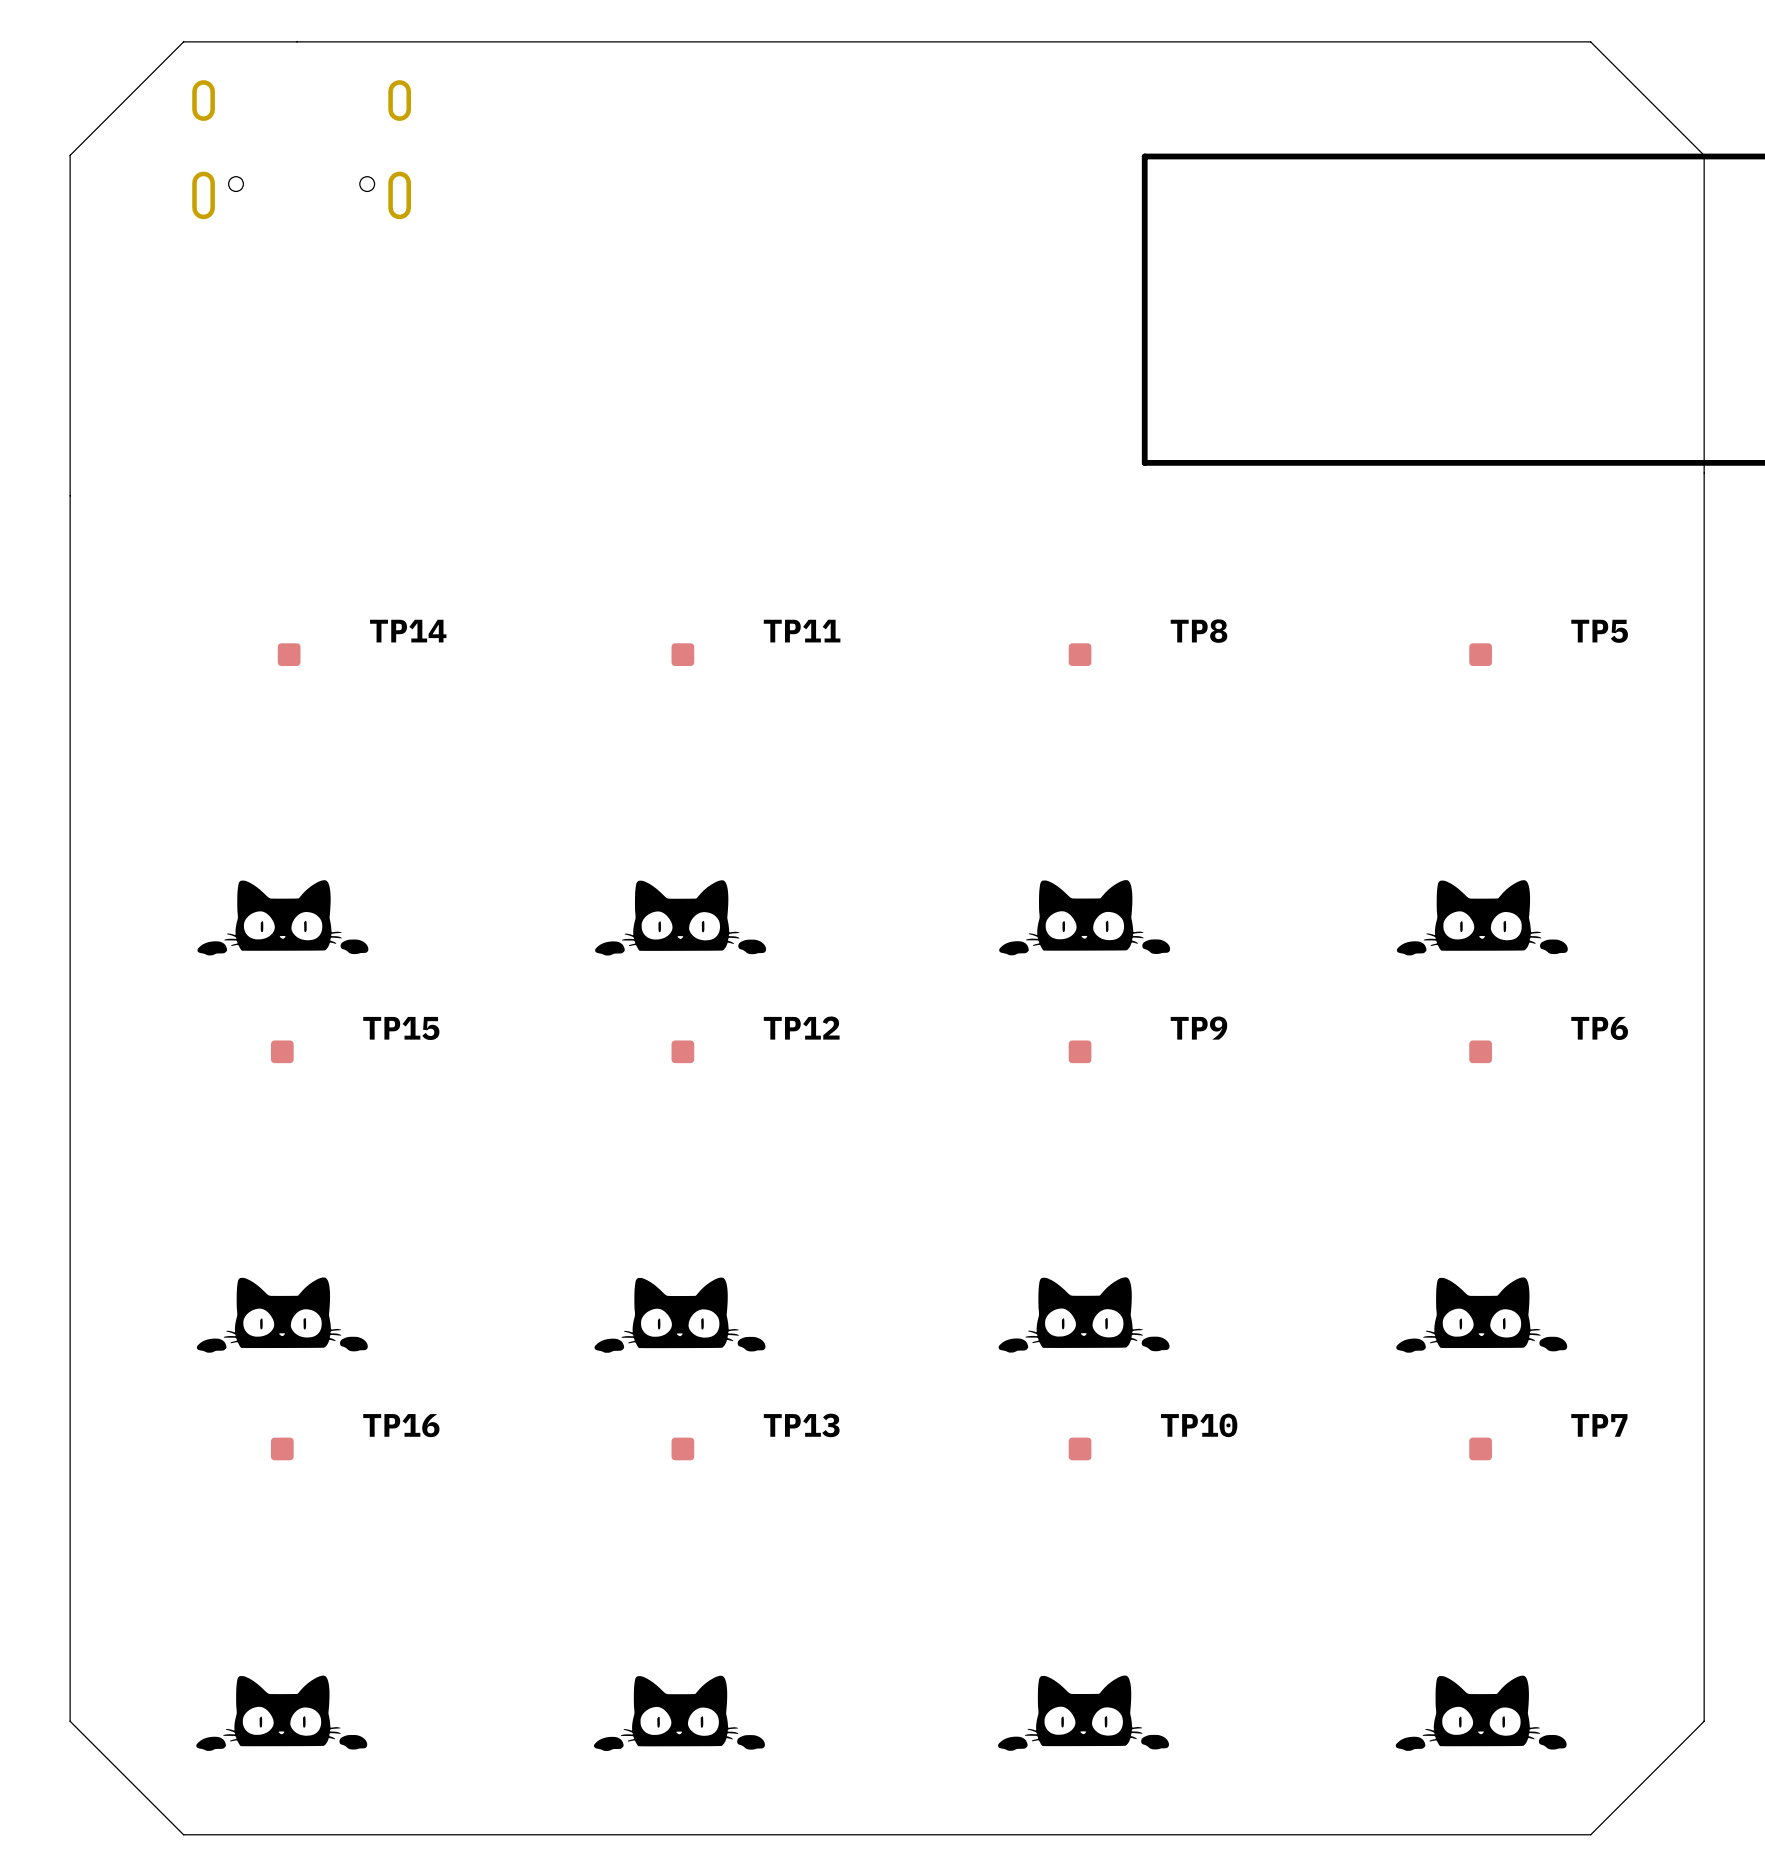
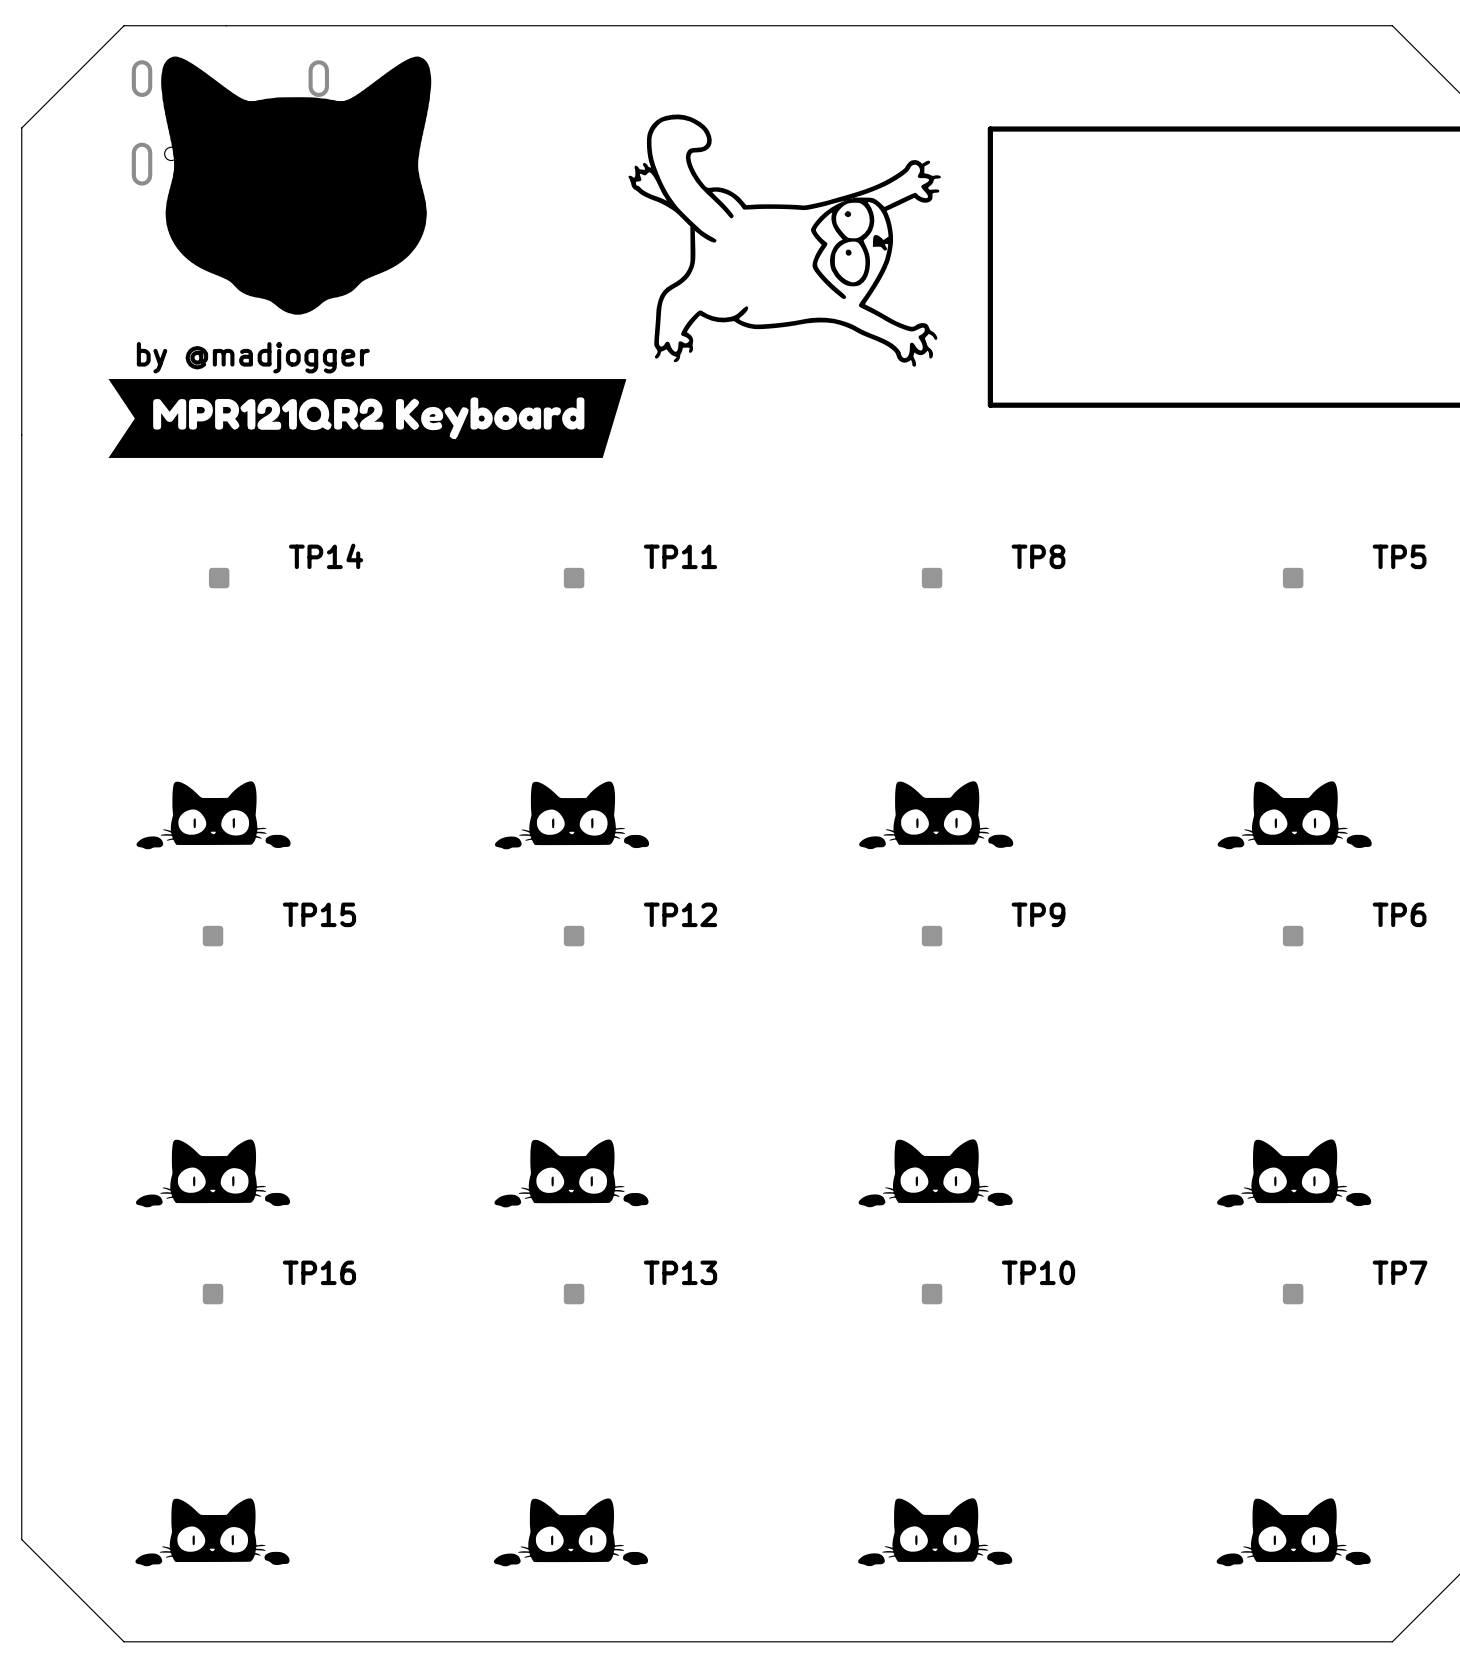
drawing: none -> [161, 56, 432, 315]
drawing: none -> [108, 114, 941, 458]
text: none -> by @madjogger (253, 357)

